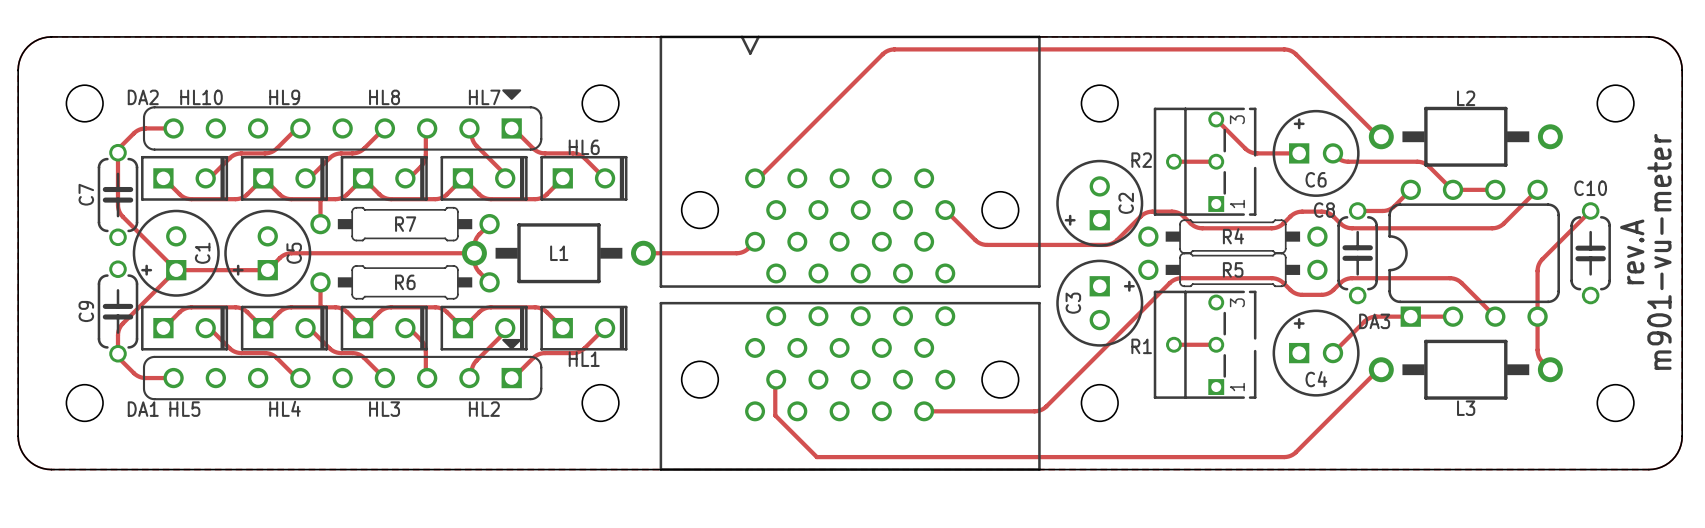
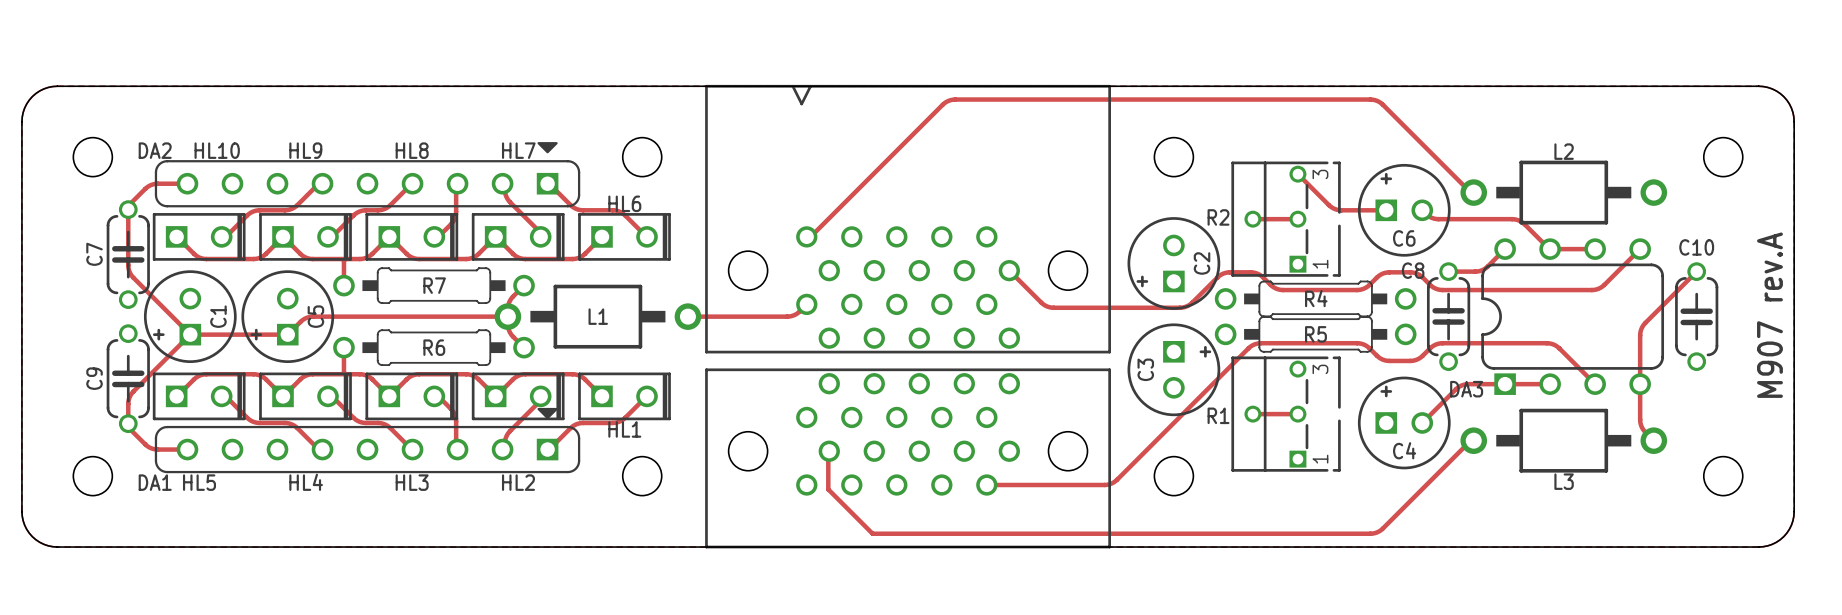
part value: rev.A (1632, 251) -> M907 rev.A (1769, 315)
part text: m901-vu-meter (1659, 251) -> none

